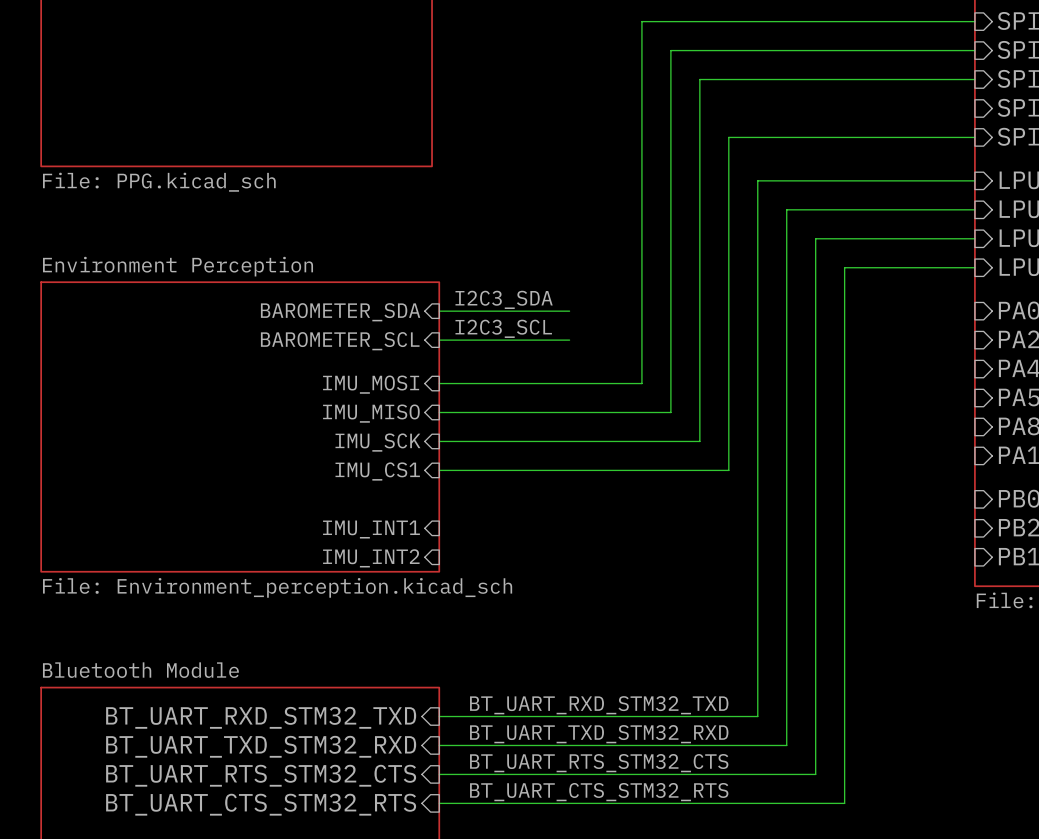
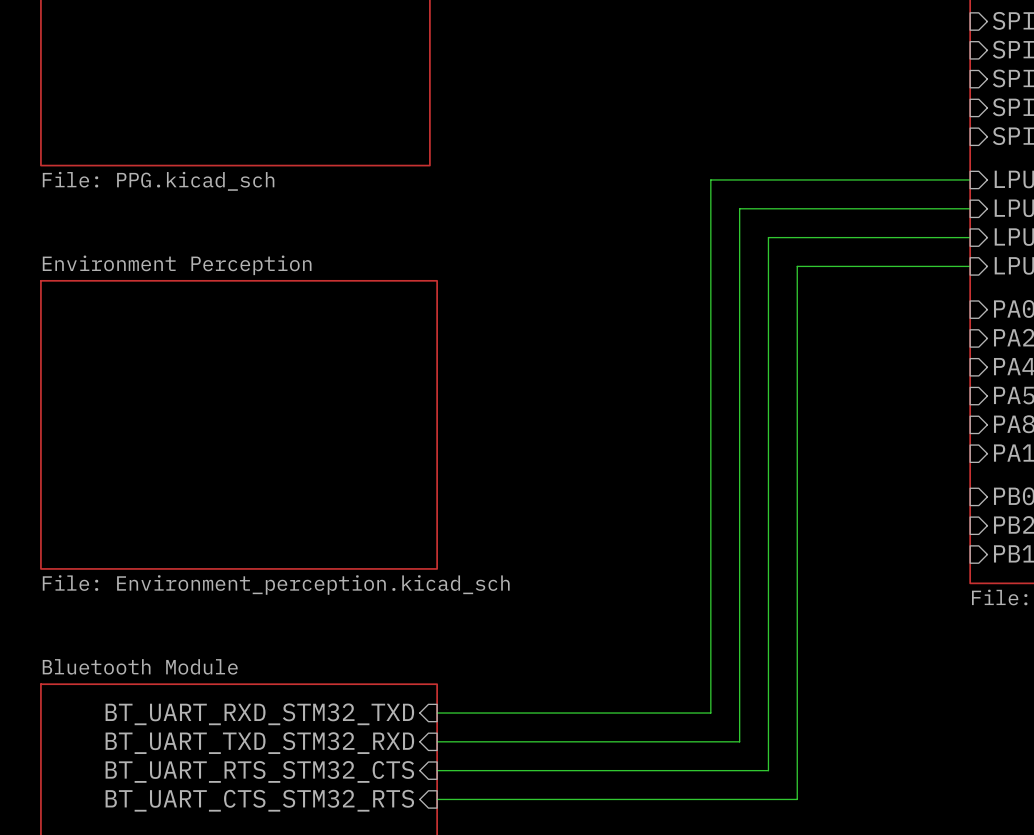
wire: (974, 21) (641, 21) (641, 383) (439, 383) -> none
wire: (974, 50) (670, 50) (670, 412) (439, 412) -> none
wire: (974, 79) (699, 79) (699, 441) (439, 441) -> none
wire: (974, 137) (728, 137) (728, 470) (439, 470) -> none
wire: (757, 180) (757, 716) (714, 716) -> (754, 179) (710, 179) (710, 713)
wire: (786, 209) (786, 745) (743, 745) -> (782, 208) (739, 208) (739, 741)
wire: (815, 238) (815, 774) (772, 774) -> (811, 237) (768, 237) (768, 770)
wire: (844, 267) (844, 803) (801, 803) -> (840, 266) (797, 266) (797, 799)
label: I2C3_SDA (504, 299) -> none
wire: (439, 311) (569, 311) -> none
sheet pin: BAROMETER_SDA (340, 312) -> none
label: I2C3_SCL (503, 328) -> none
wire: (439, 340) (569, 340) -> none
sheet pin: BAROMETER_SCL (340, 341) -> none
sheet pin: IMU_MOSI (371, 384) -> none
sheet pin: IMU_MISO (371, 413) -> none
sheet pin: IMU_SCK (377, 442) -> none
sheet pin: IMU_CS1 (377, 471) -> none
sheet pin: IMU_INT1 (371, 529) -> none
sheet pin: IMU_INT2 (371, 558) -> none
label: BT_UART_RXD_STM32_TXD (599, 705) -> none
label: BT_UART_TXD_STM32_RXD (599, 734) -> none
label: BT_UART_RTS_STM32_CTS (599, 763) -> none
label: BT_UART_CTS_STM32_RTS (599, 792) -> none

